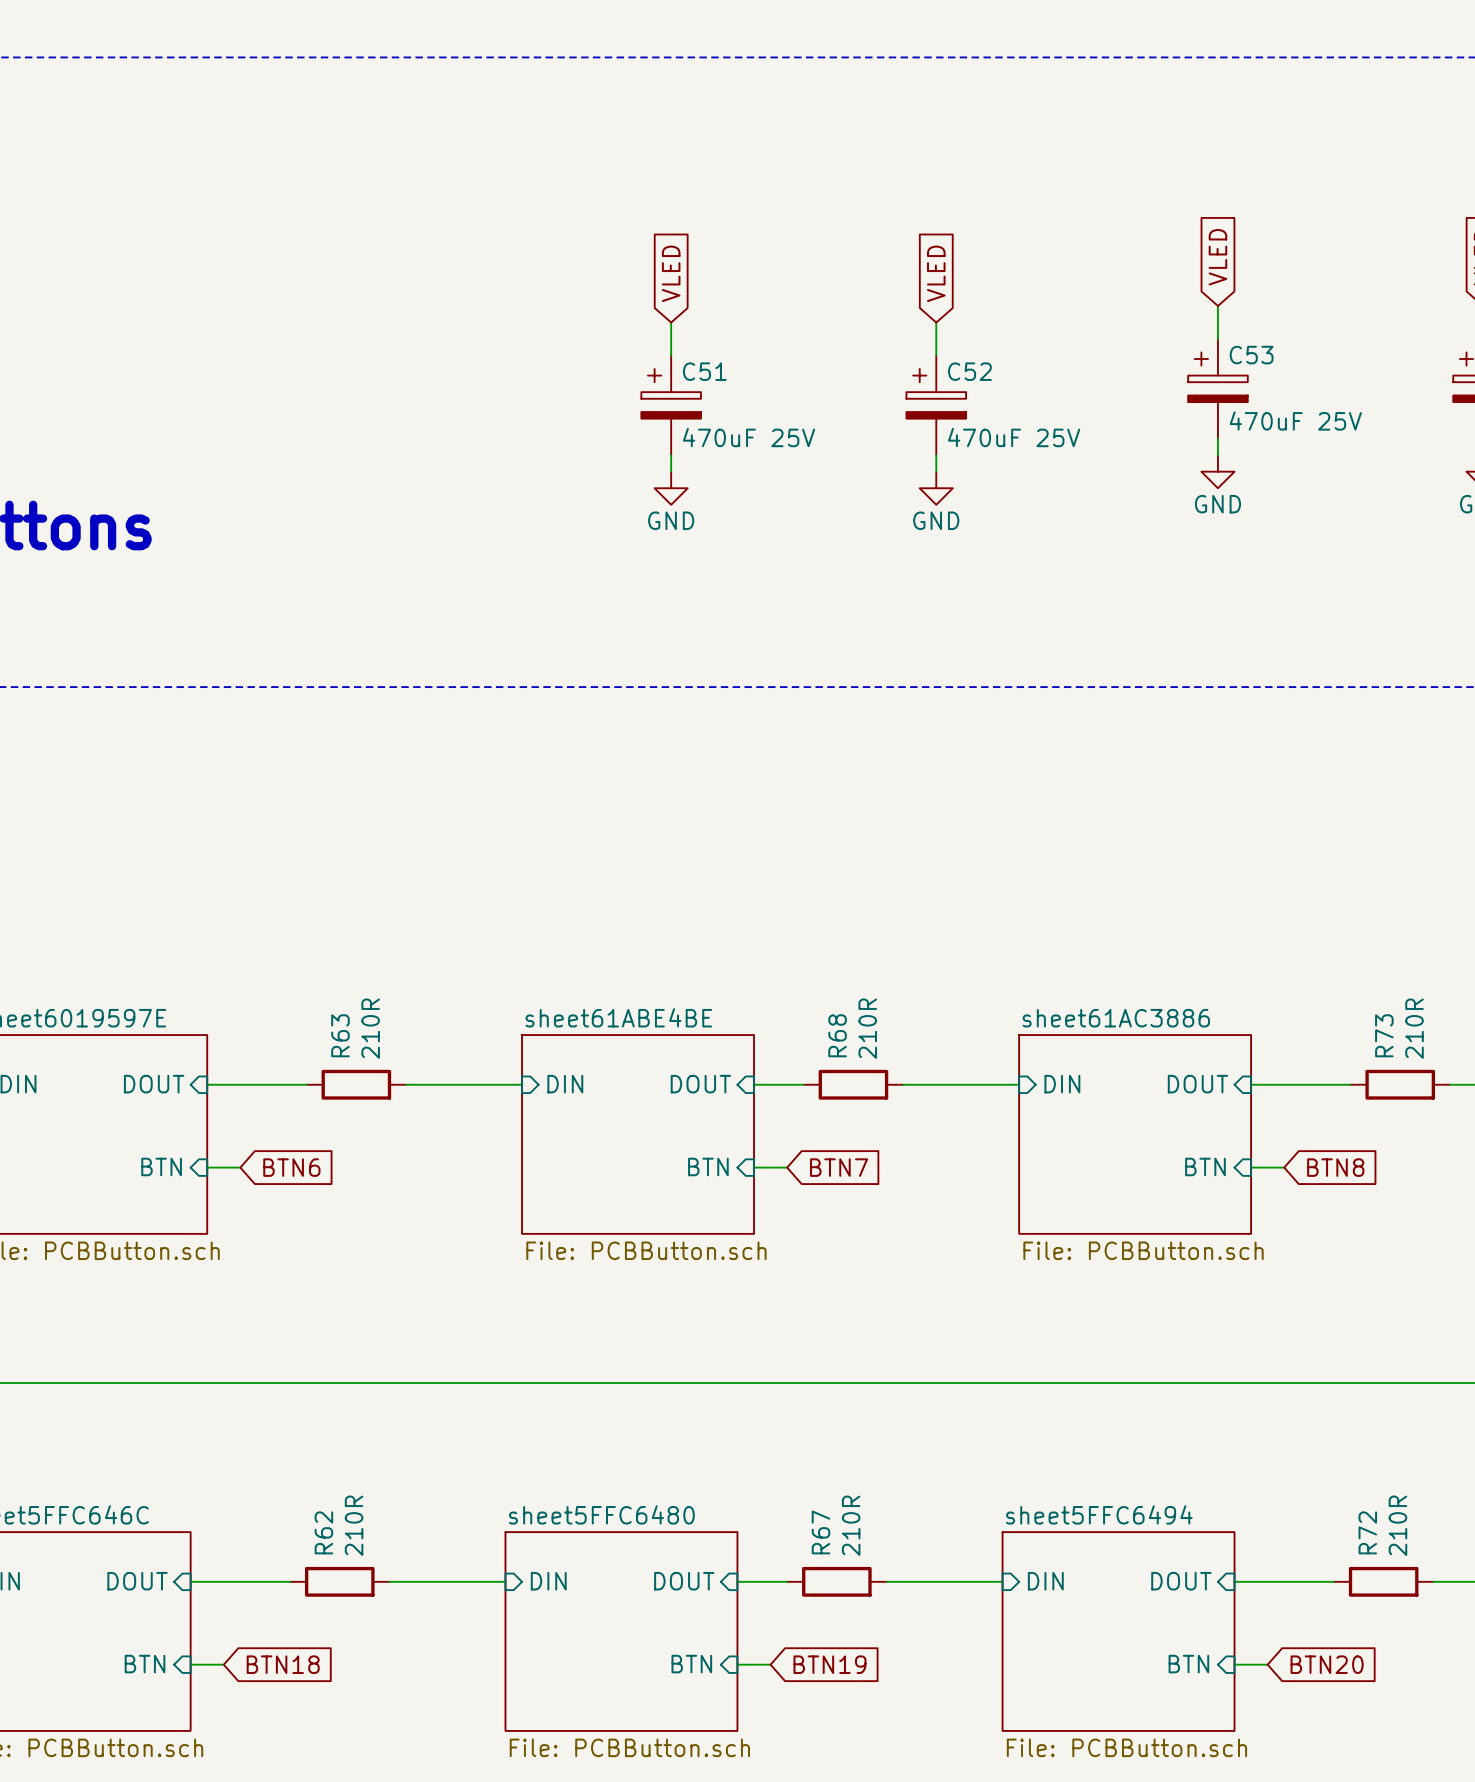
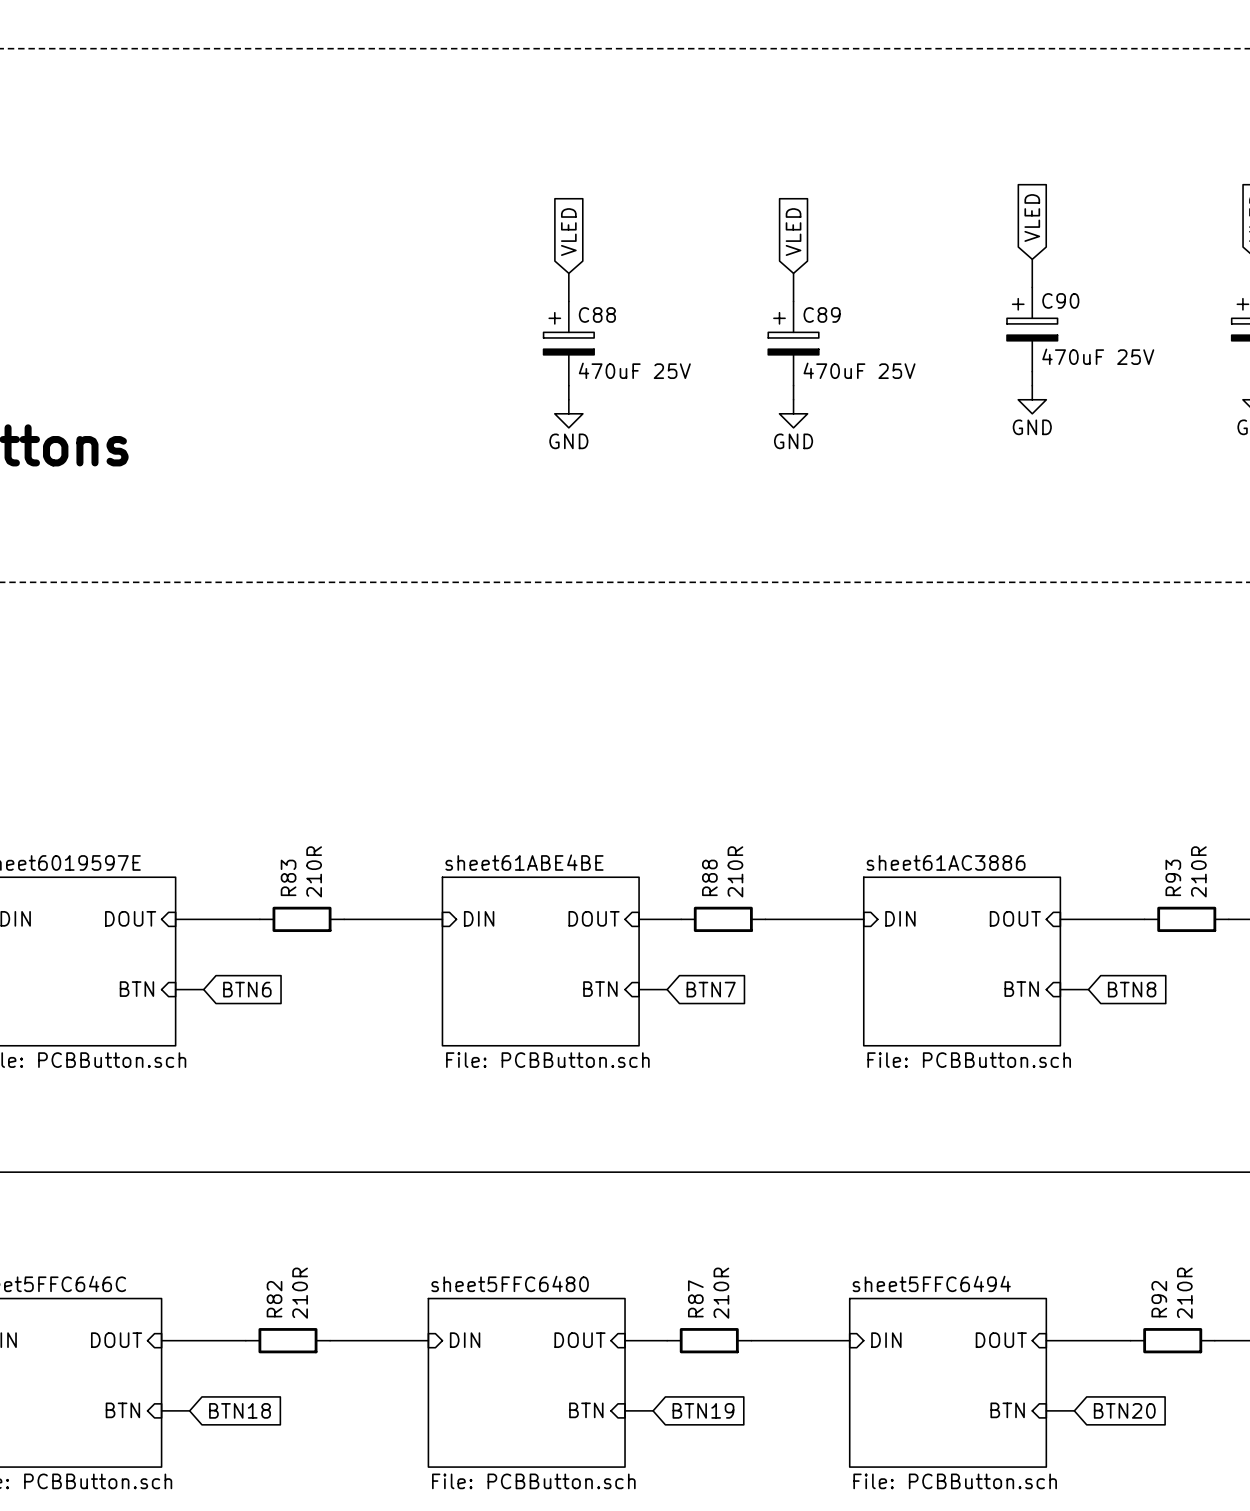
C53 name: C53 (1251, 355) -> C90 (1060, 300)
C51 name: C51 (704, 371) -> C88 (597, 314)
C52 name: C52 (969, 371) -> C89 (822, 314)
R63 name: R63 (340, 1035) -> R83 (288, 877)
R68 name: R68 (837, 1035) -> R88 (709, 877)
R73 name: R73 (1384, 1035) -> R93 (1173, 877)
R62 name: R62 (323, 1532) -> R82 (274, 1299)
R67 name: R67 (821, 1532) -> R87 (695, 1298)
R72 name: R72 (1367, 1532) -> R92 (1159, 1299)

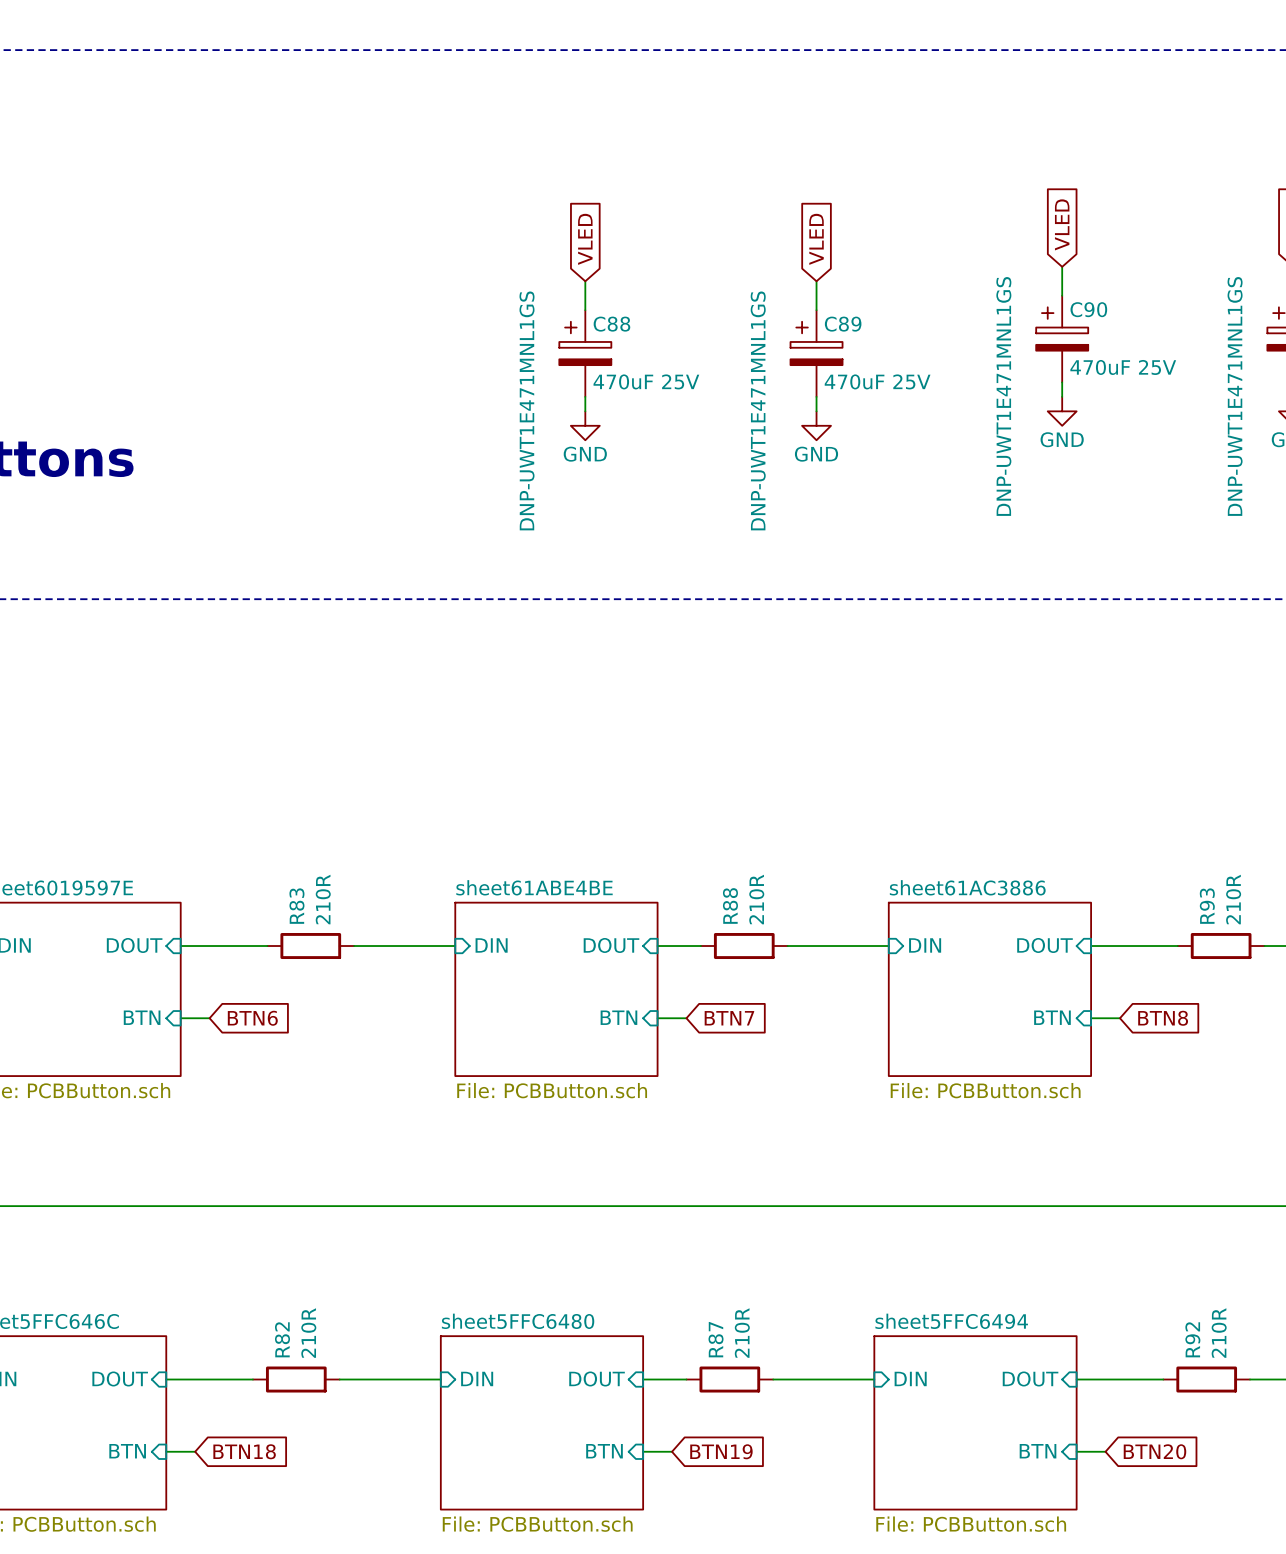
C90 text: none -> DNP-UWT1E471MNL1GS (1003, 396)
part text: none -> DNP-UWT1E471MNL1GS (1235, 396)
C88 text: none -> DNP-UWT1E471MNL1GS (526, 410)
C89 text: none -> DNP-UWT1E471MNL1GS (758, 410)

